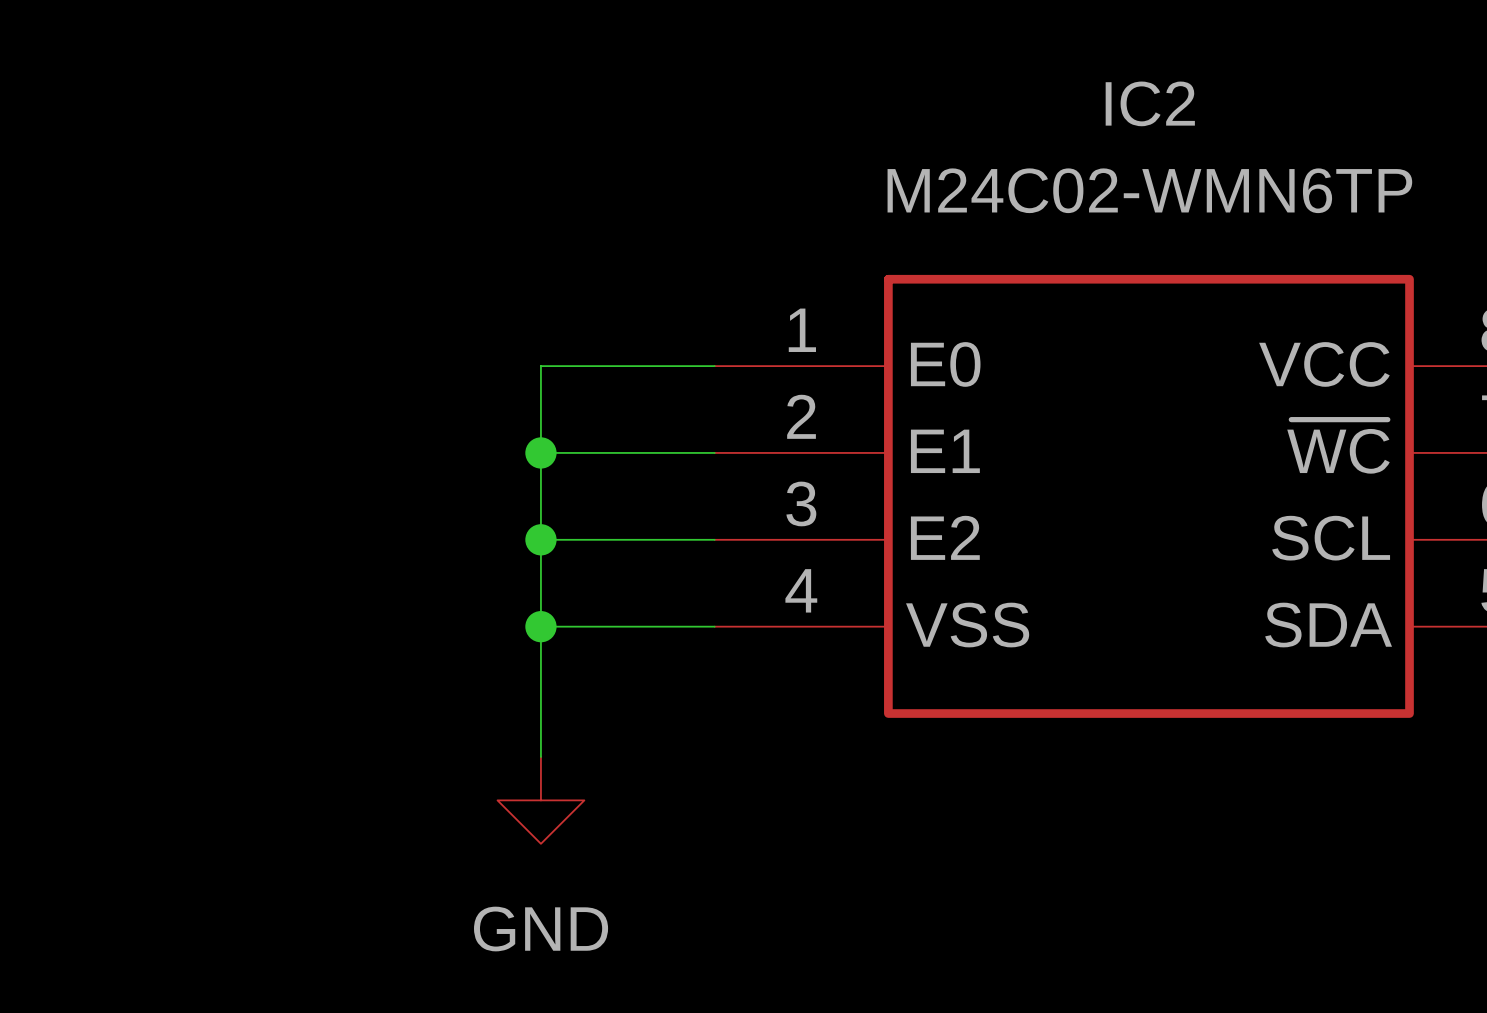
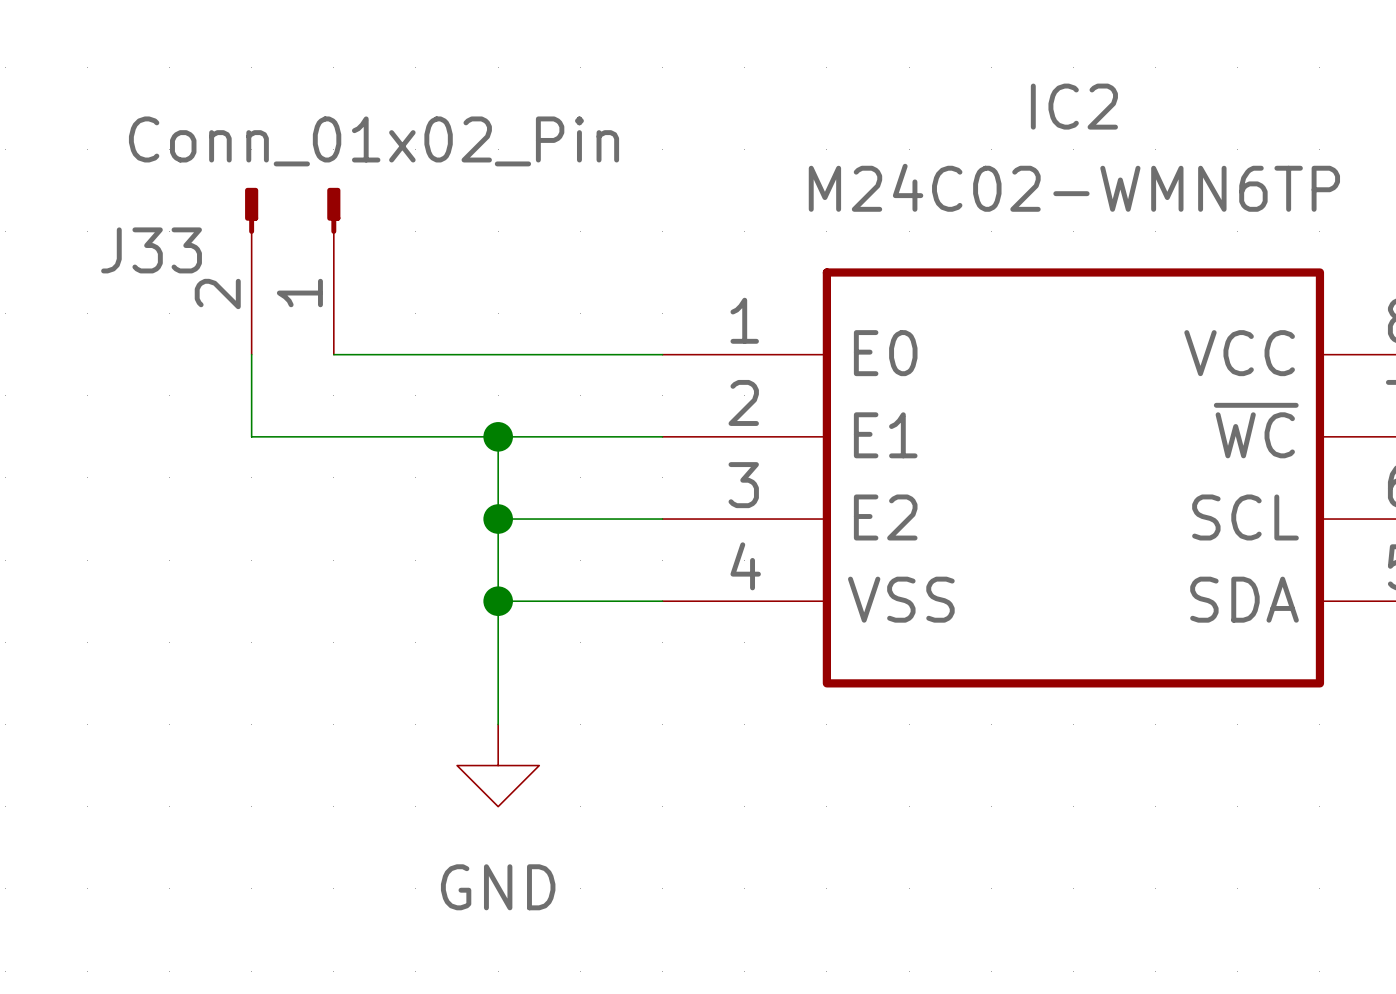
J33: none -> Conn_01x02_Pin (292, 271)
wire: none -> (251, 354) (251, 436) (498, 436)
wire: (540, 366) (540, 452) -> (498, 354) (333, 354)

